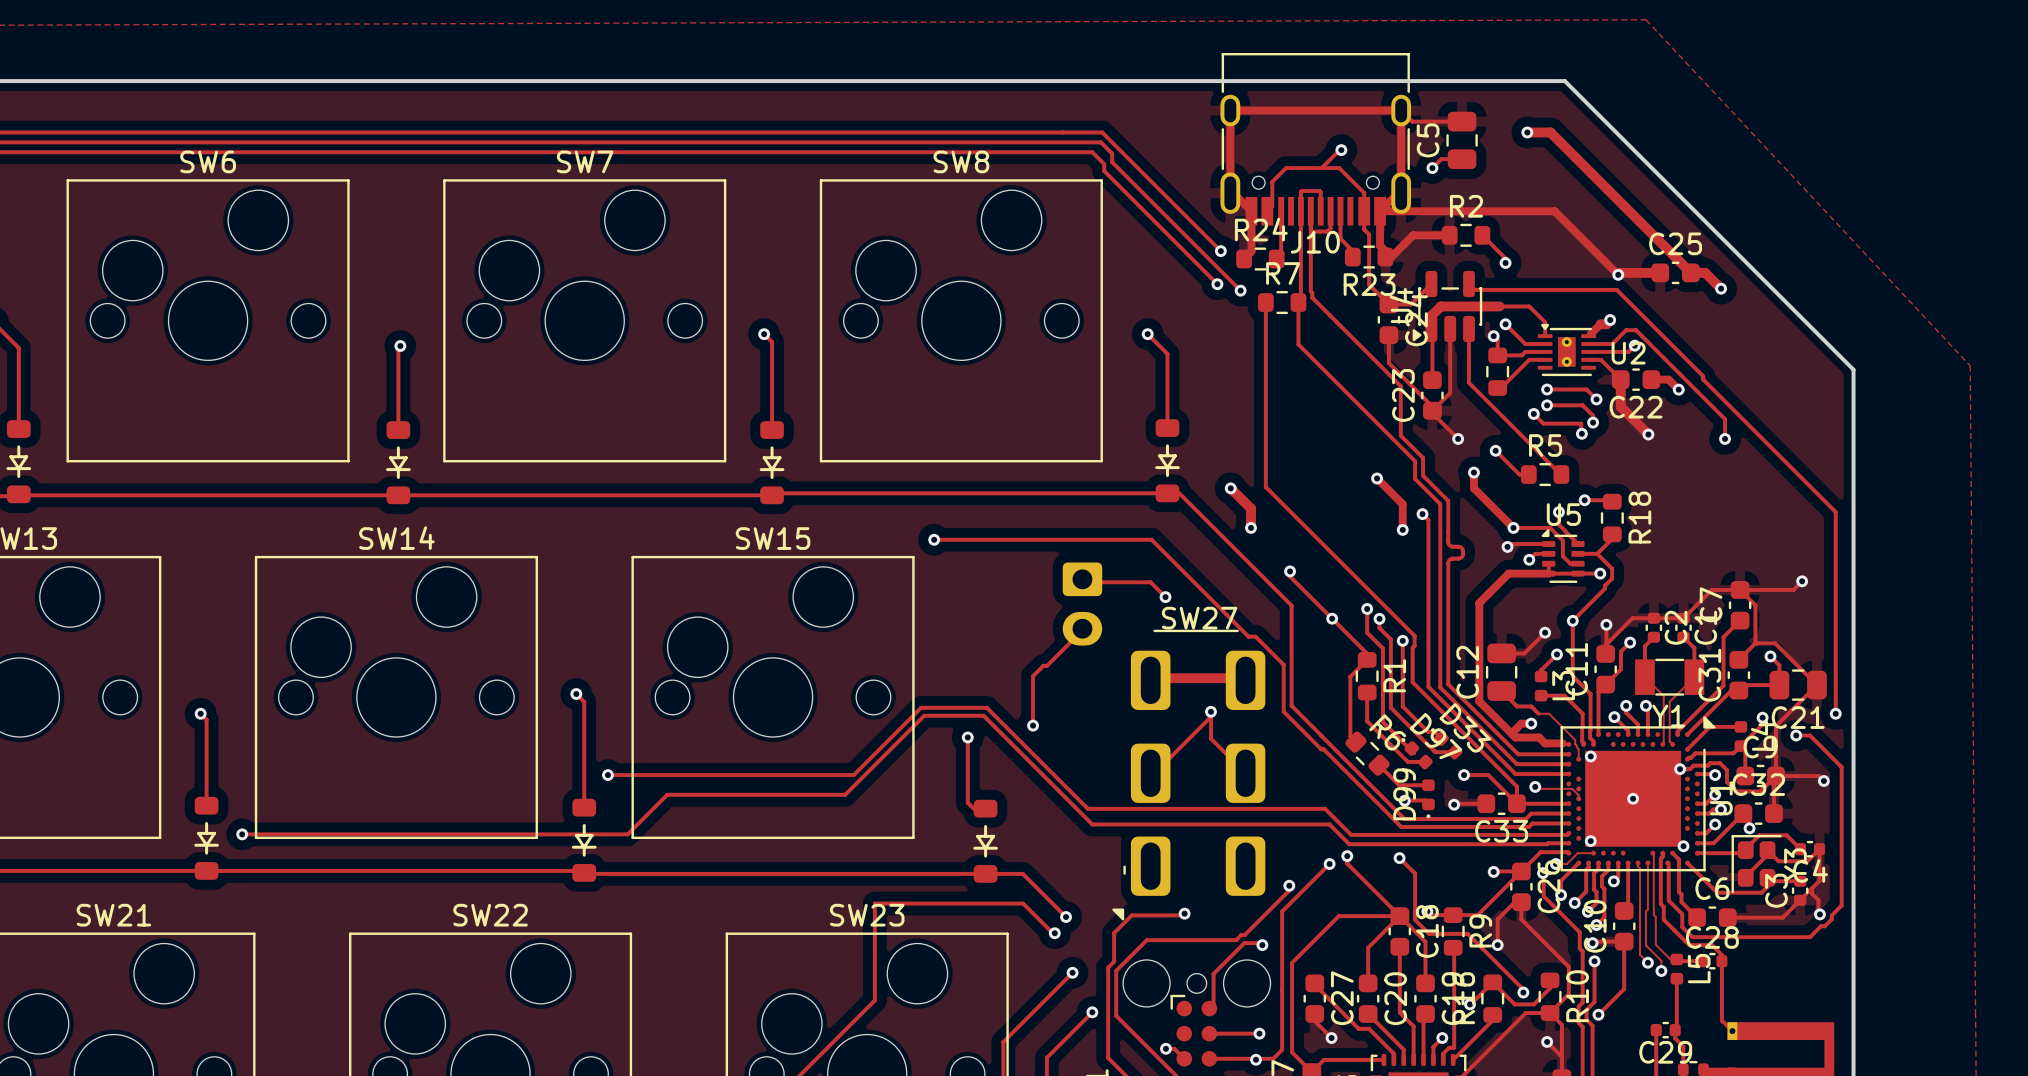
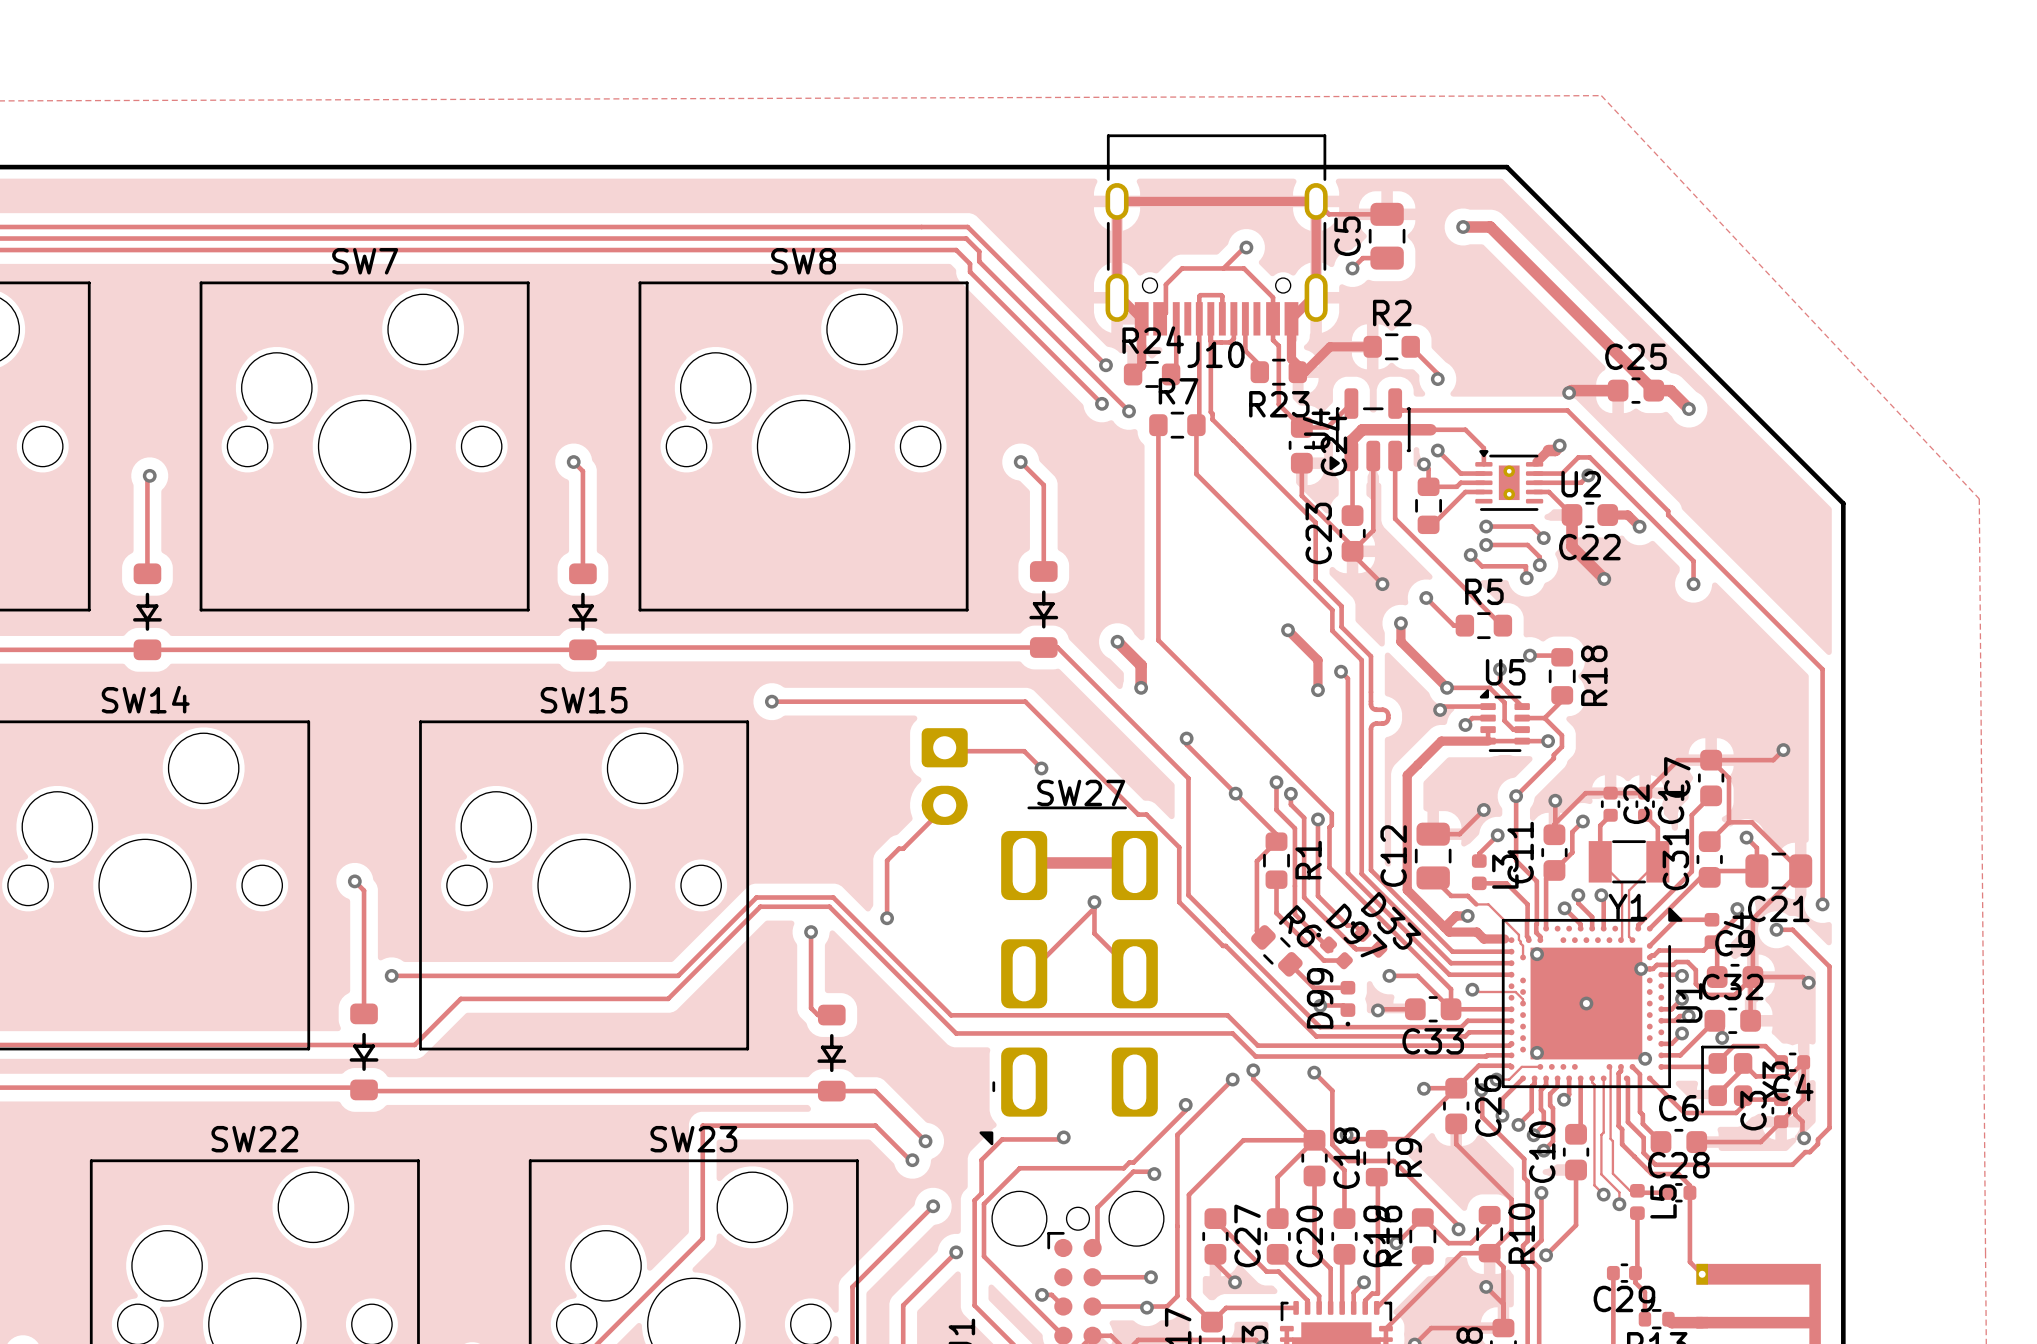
track: (1380, 211) (1554, 211) (1618, 274) -> none
track: (1521, 902) (1514, 902) (1497, 919) (1497, 945) -> none
track: (1624, 941) (1592, 943) -> none
via: (1592, 943) -> none
via: (1497, 945) -> none

